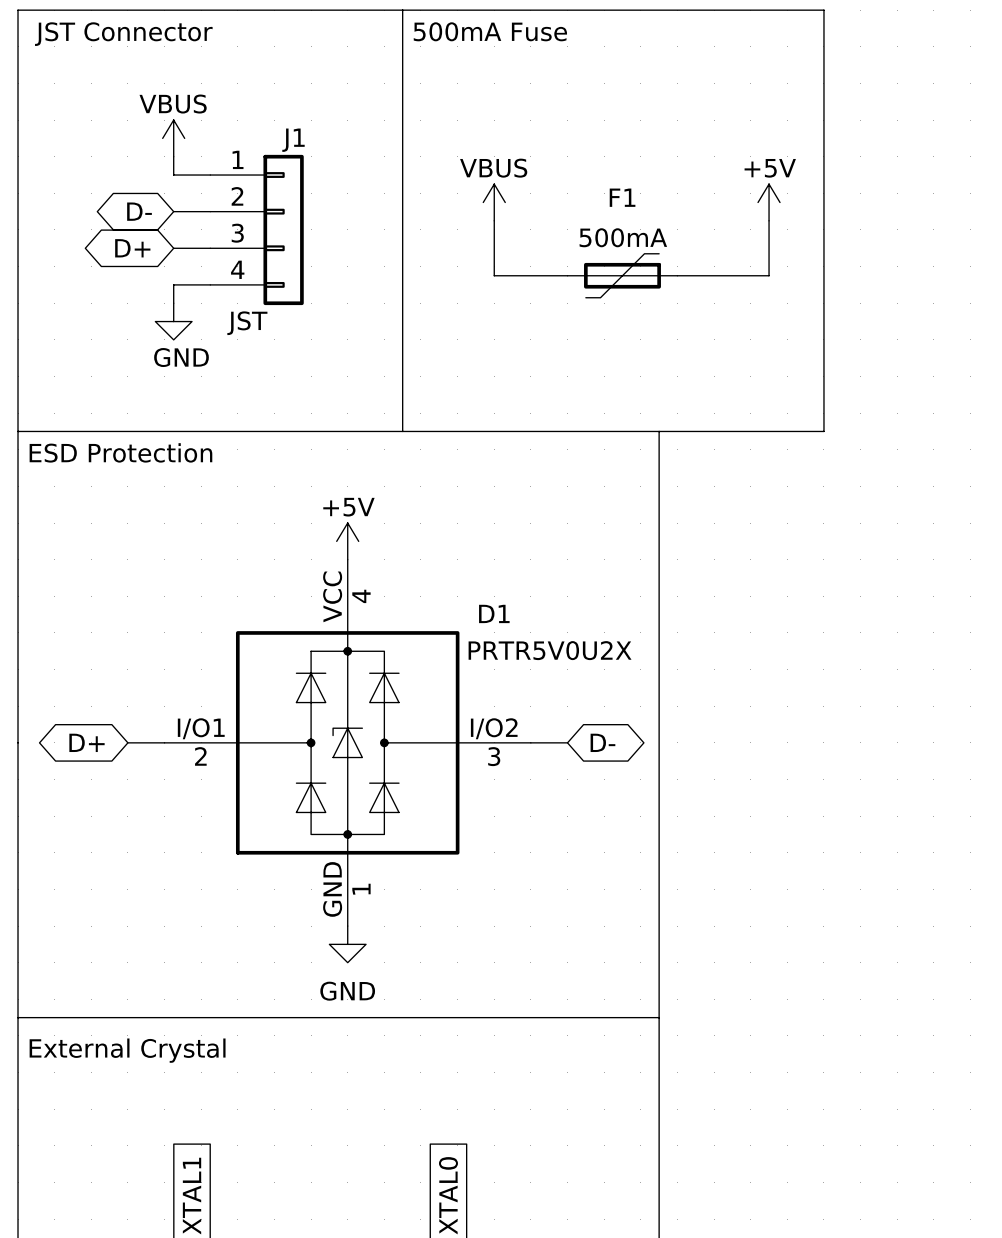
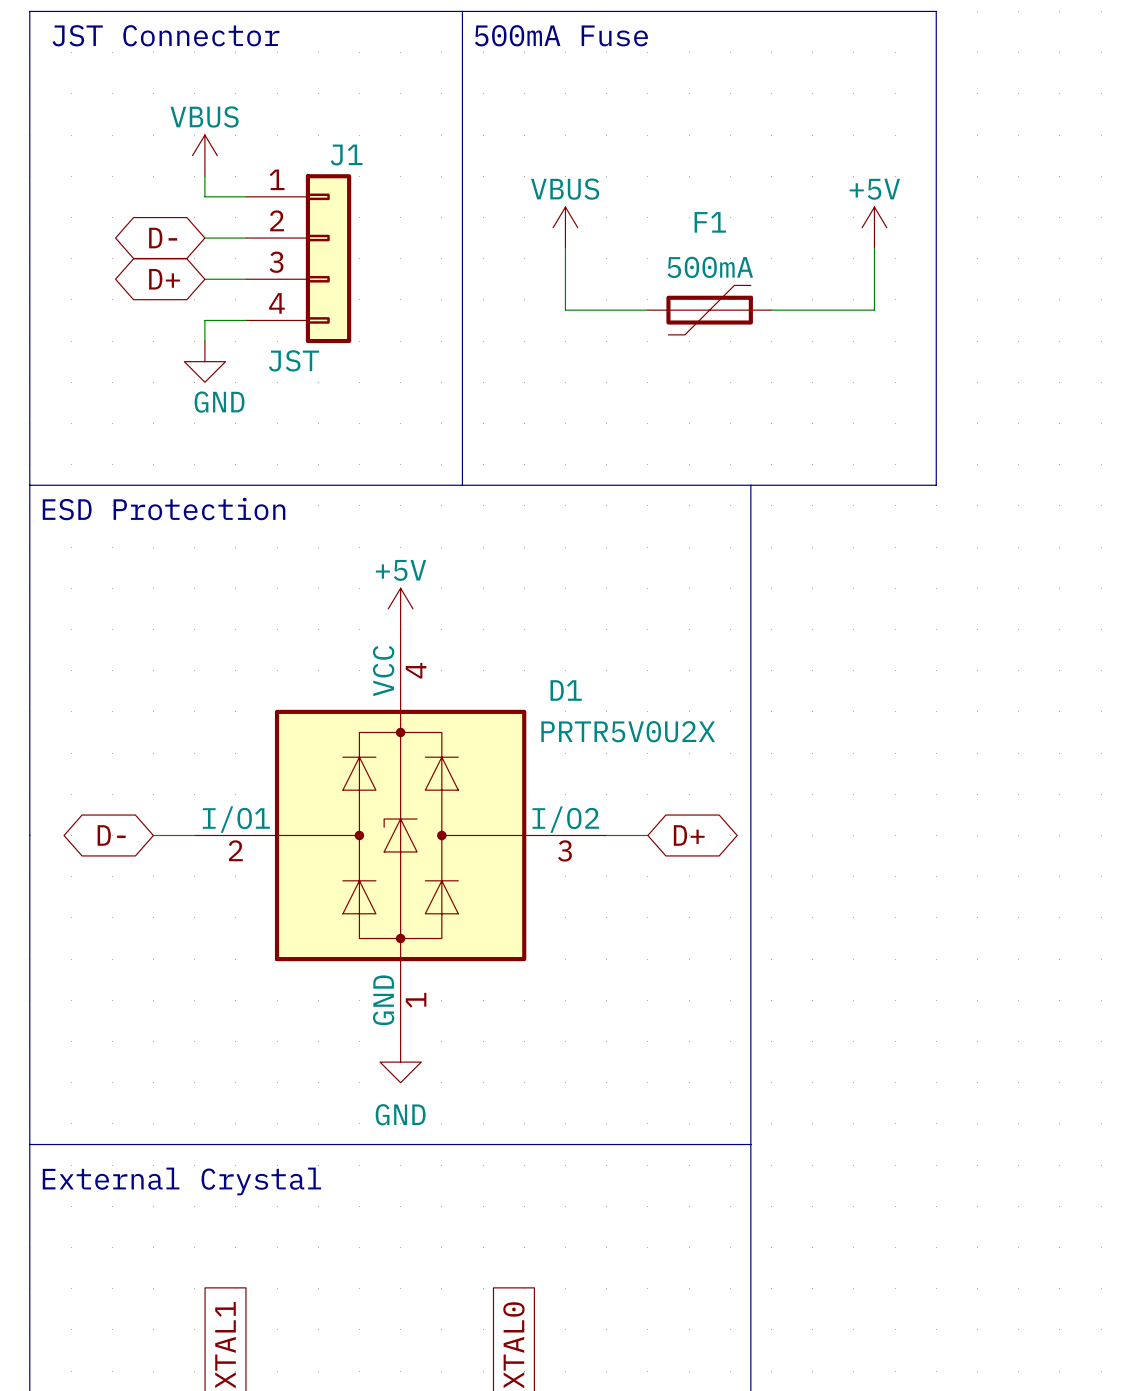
global label: D+ (87, 742) -> D- (111, 835)
global label: D- (602, 742) -> D+ (689, 835)

